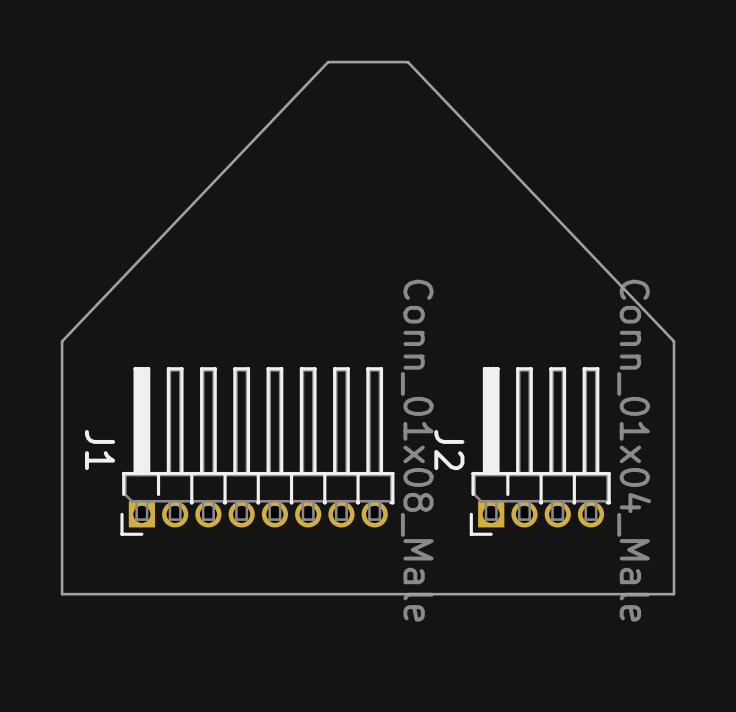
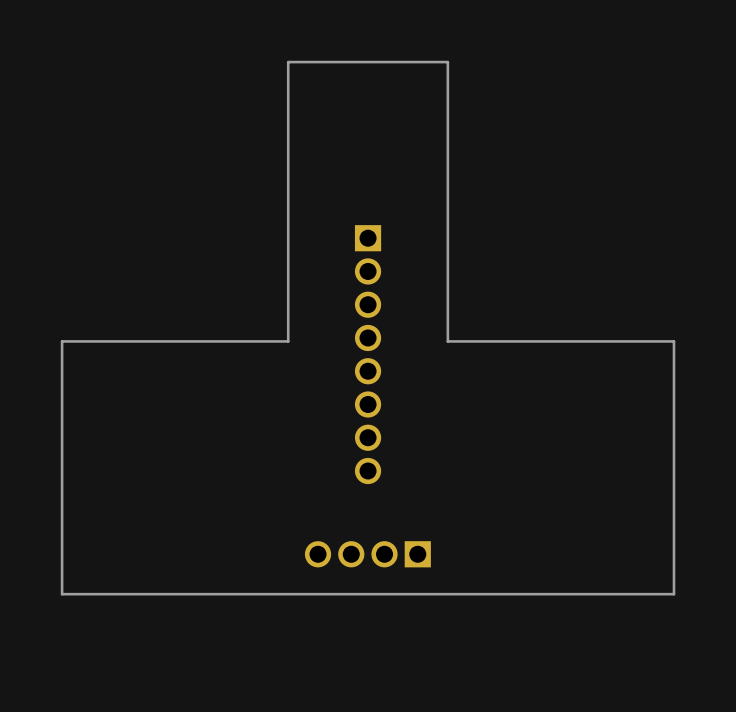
board edge: (328, 62) (62, 341) -> (328, 62) (288, 62) (288, 341) (62, 341)
board edge: (407, 62) (673, 341) -> (407, 62) (447, 62) (447, 341) (673, 341)
J1 side: bottom (257, 451) -> top (368, 354)
J2 side: bottom (540, 451) -> top (367, 554)

